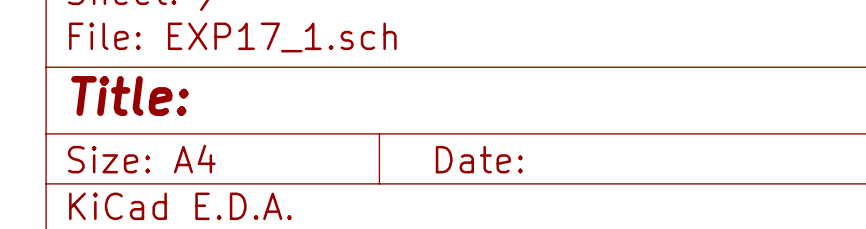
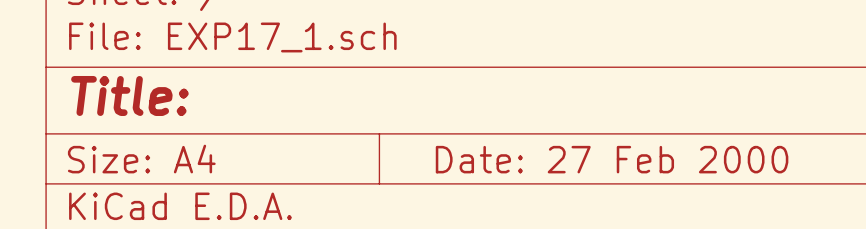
title block: Date: (479, 159) -> Date: 27 Feb 2000 (612, 159)

